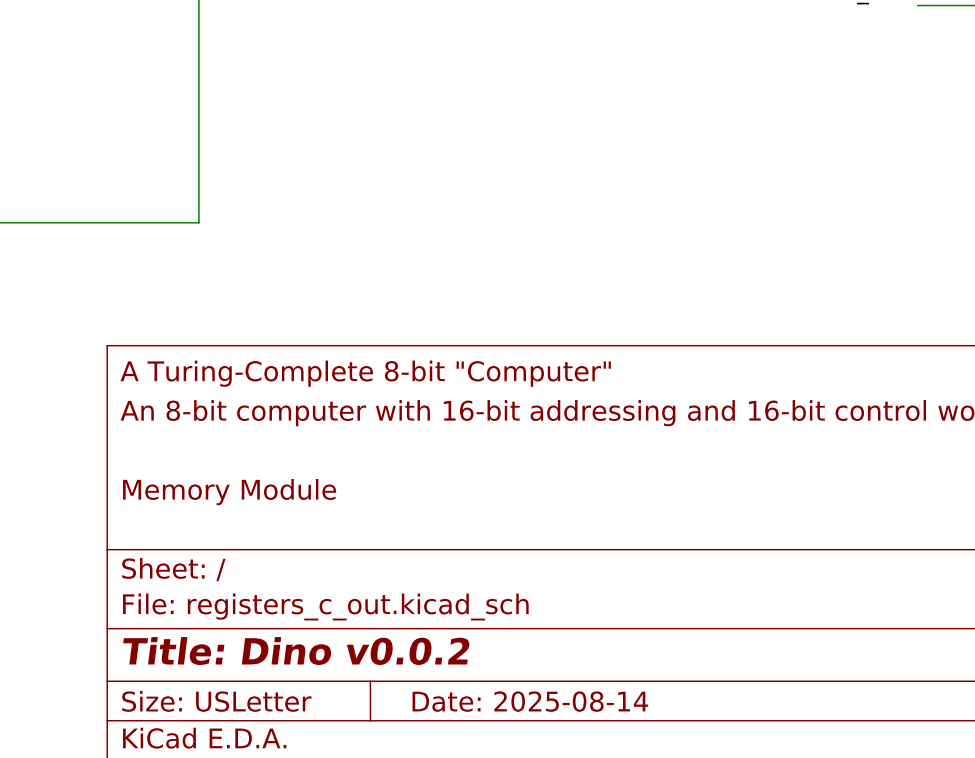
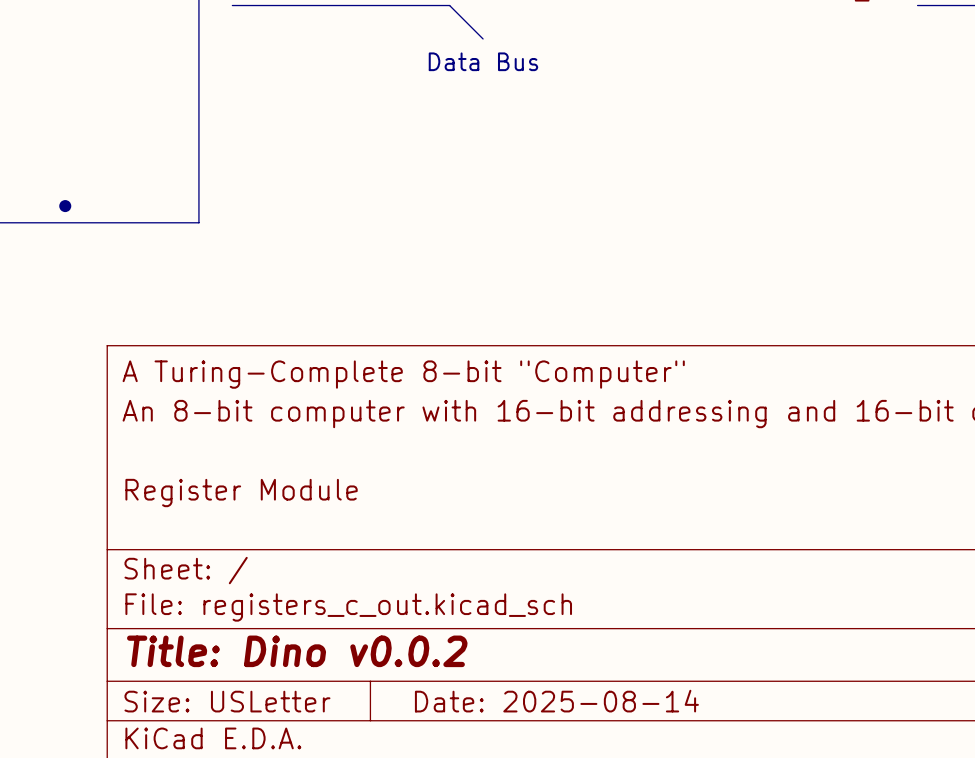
wire: none -> (232, 5) (449, 5) (483, 38)
text: none -> Data Bus (483, 61)
junction: none -> (65, 206)
title block: Memory Module (229, 492) -> Register Module (241, 493)

